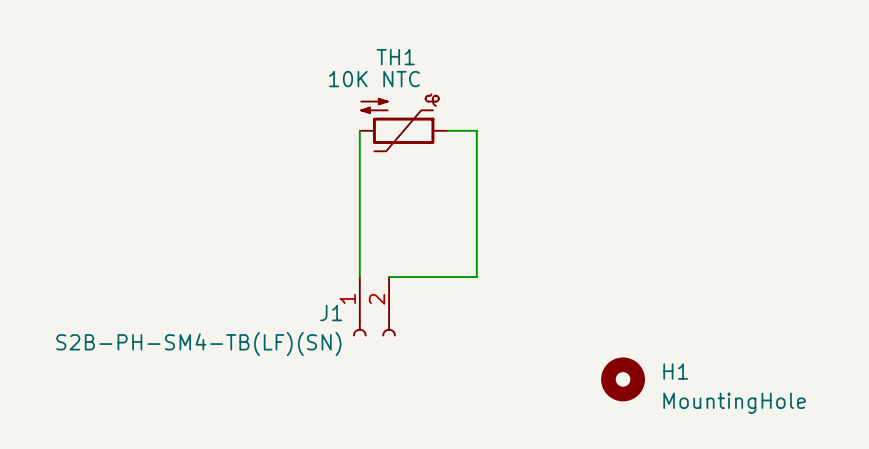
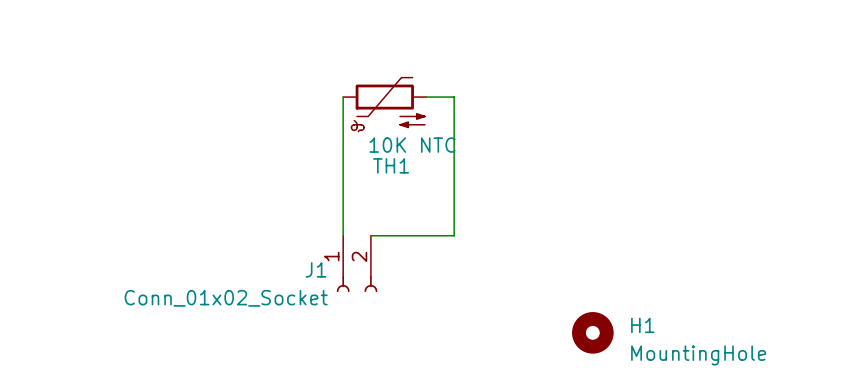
TH1 rotation: 0° (400, 122) -> 180° (388, 104)
J1 value: S2B-PH-SM4-TB(LF)(SN) (198, 344) -> Conn_01x02_Socket (226, 298)

